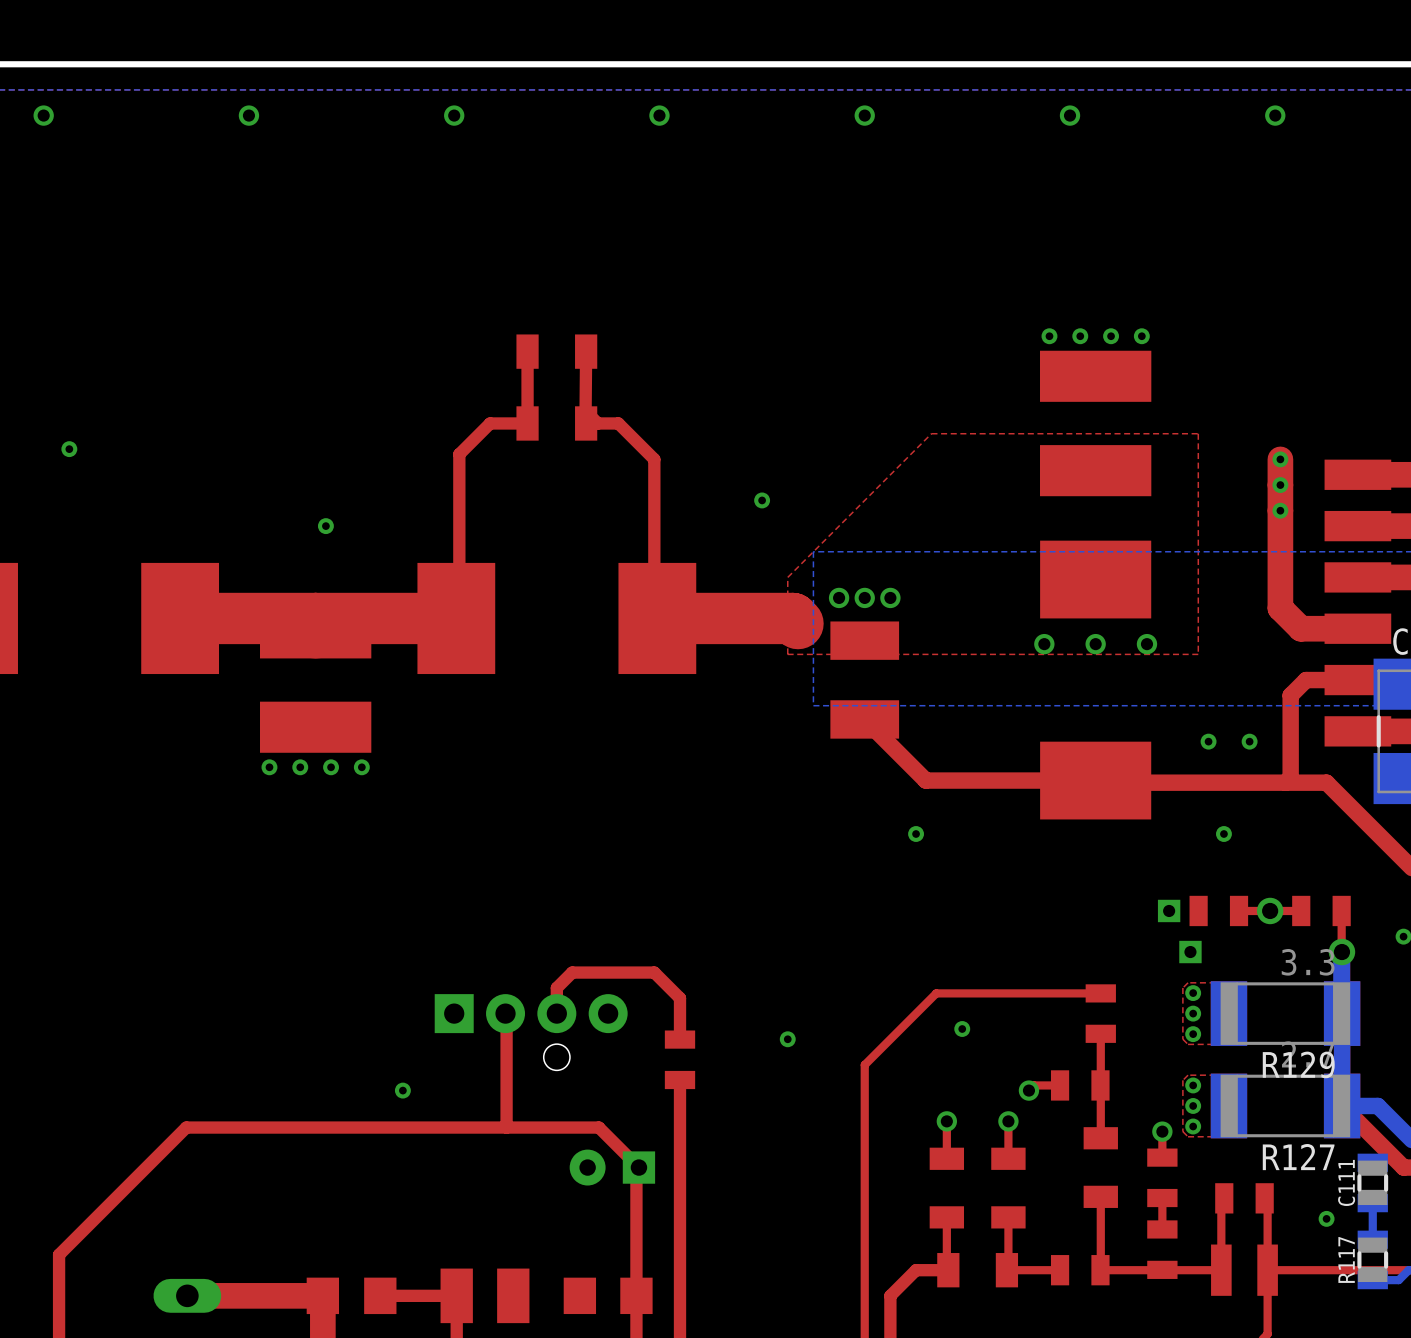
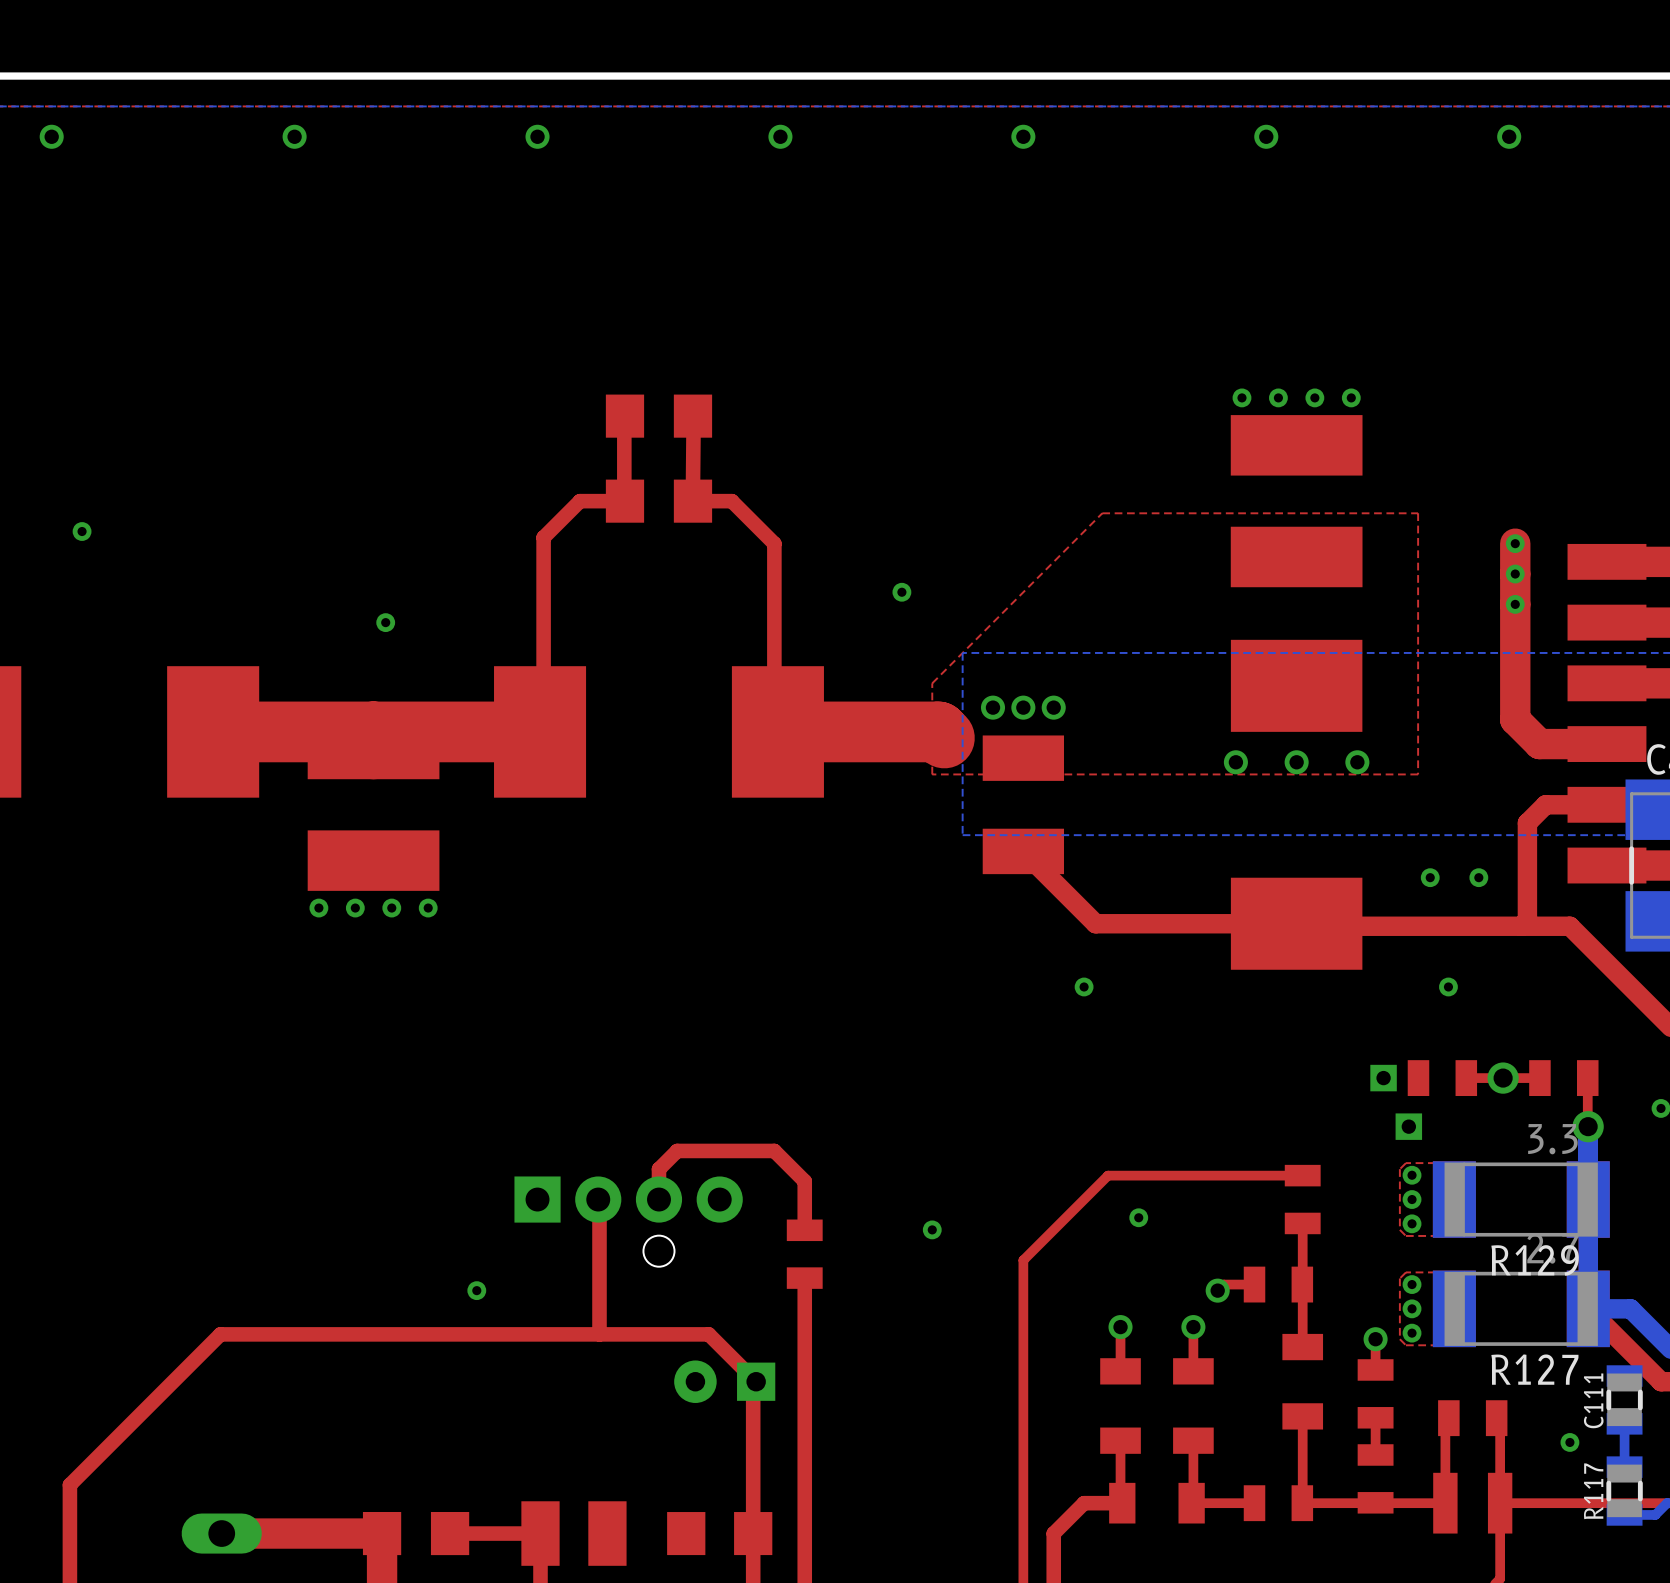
part footprint: [516, 334, 598, 369] -> [605, 394, 713, 438]
part footprint: [516, 406, 598, 441] -> [605, 479, 713, 523]

